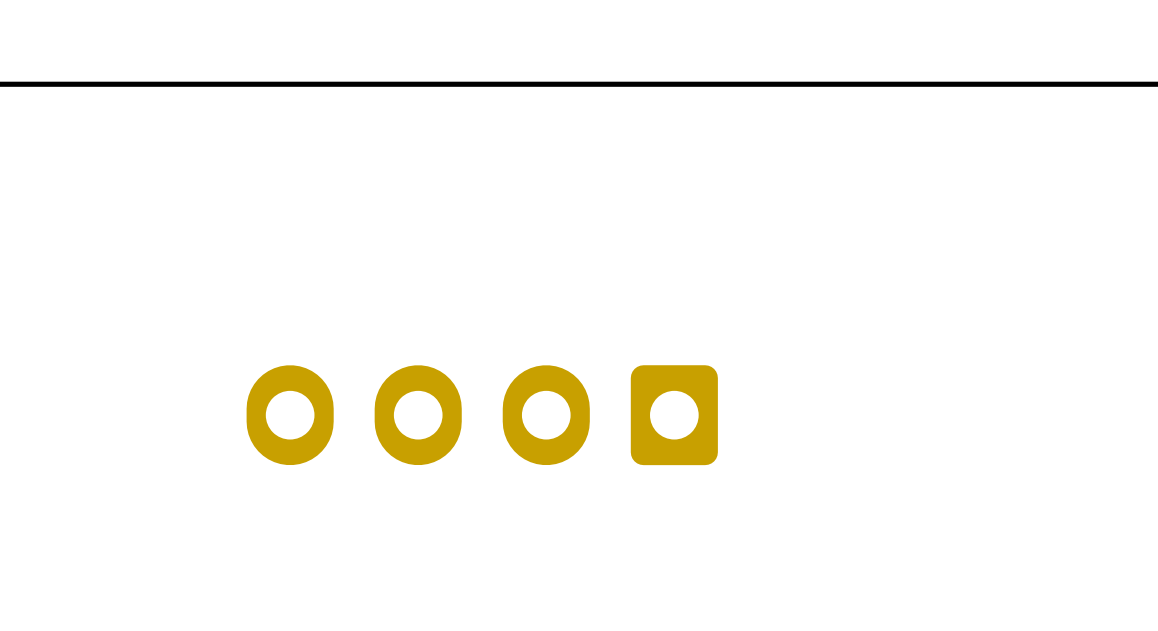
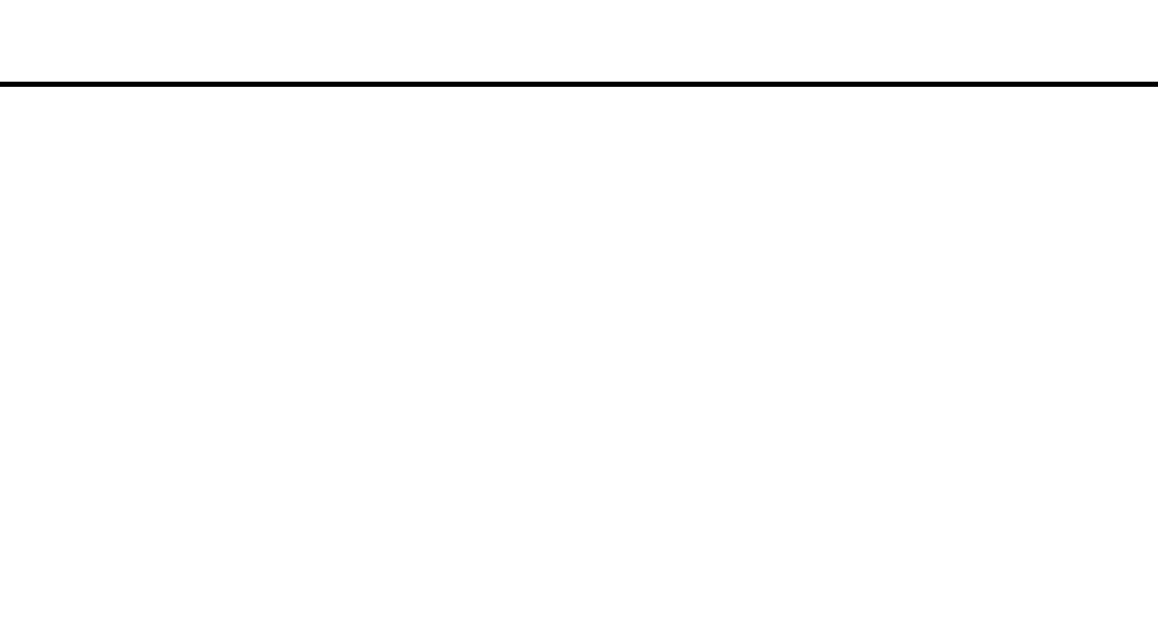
part: (482, 415) -> none

